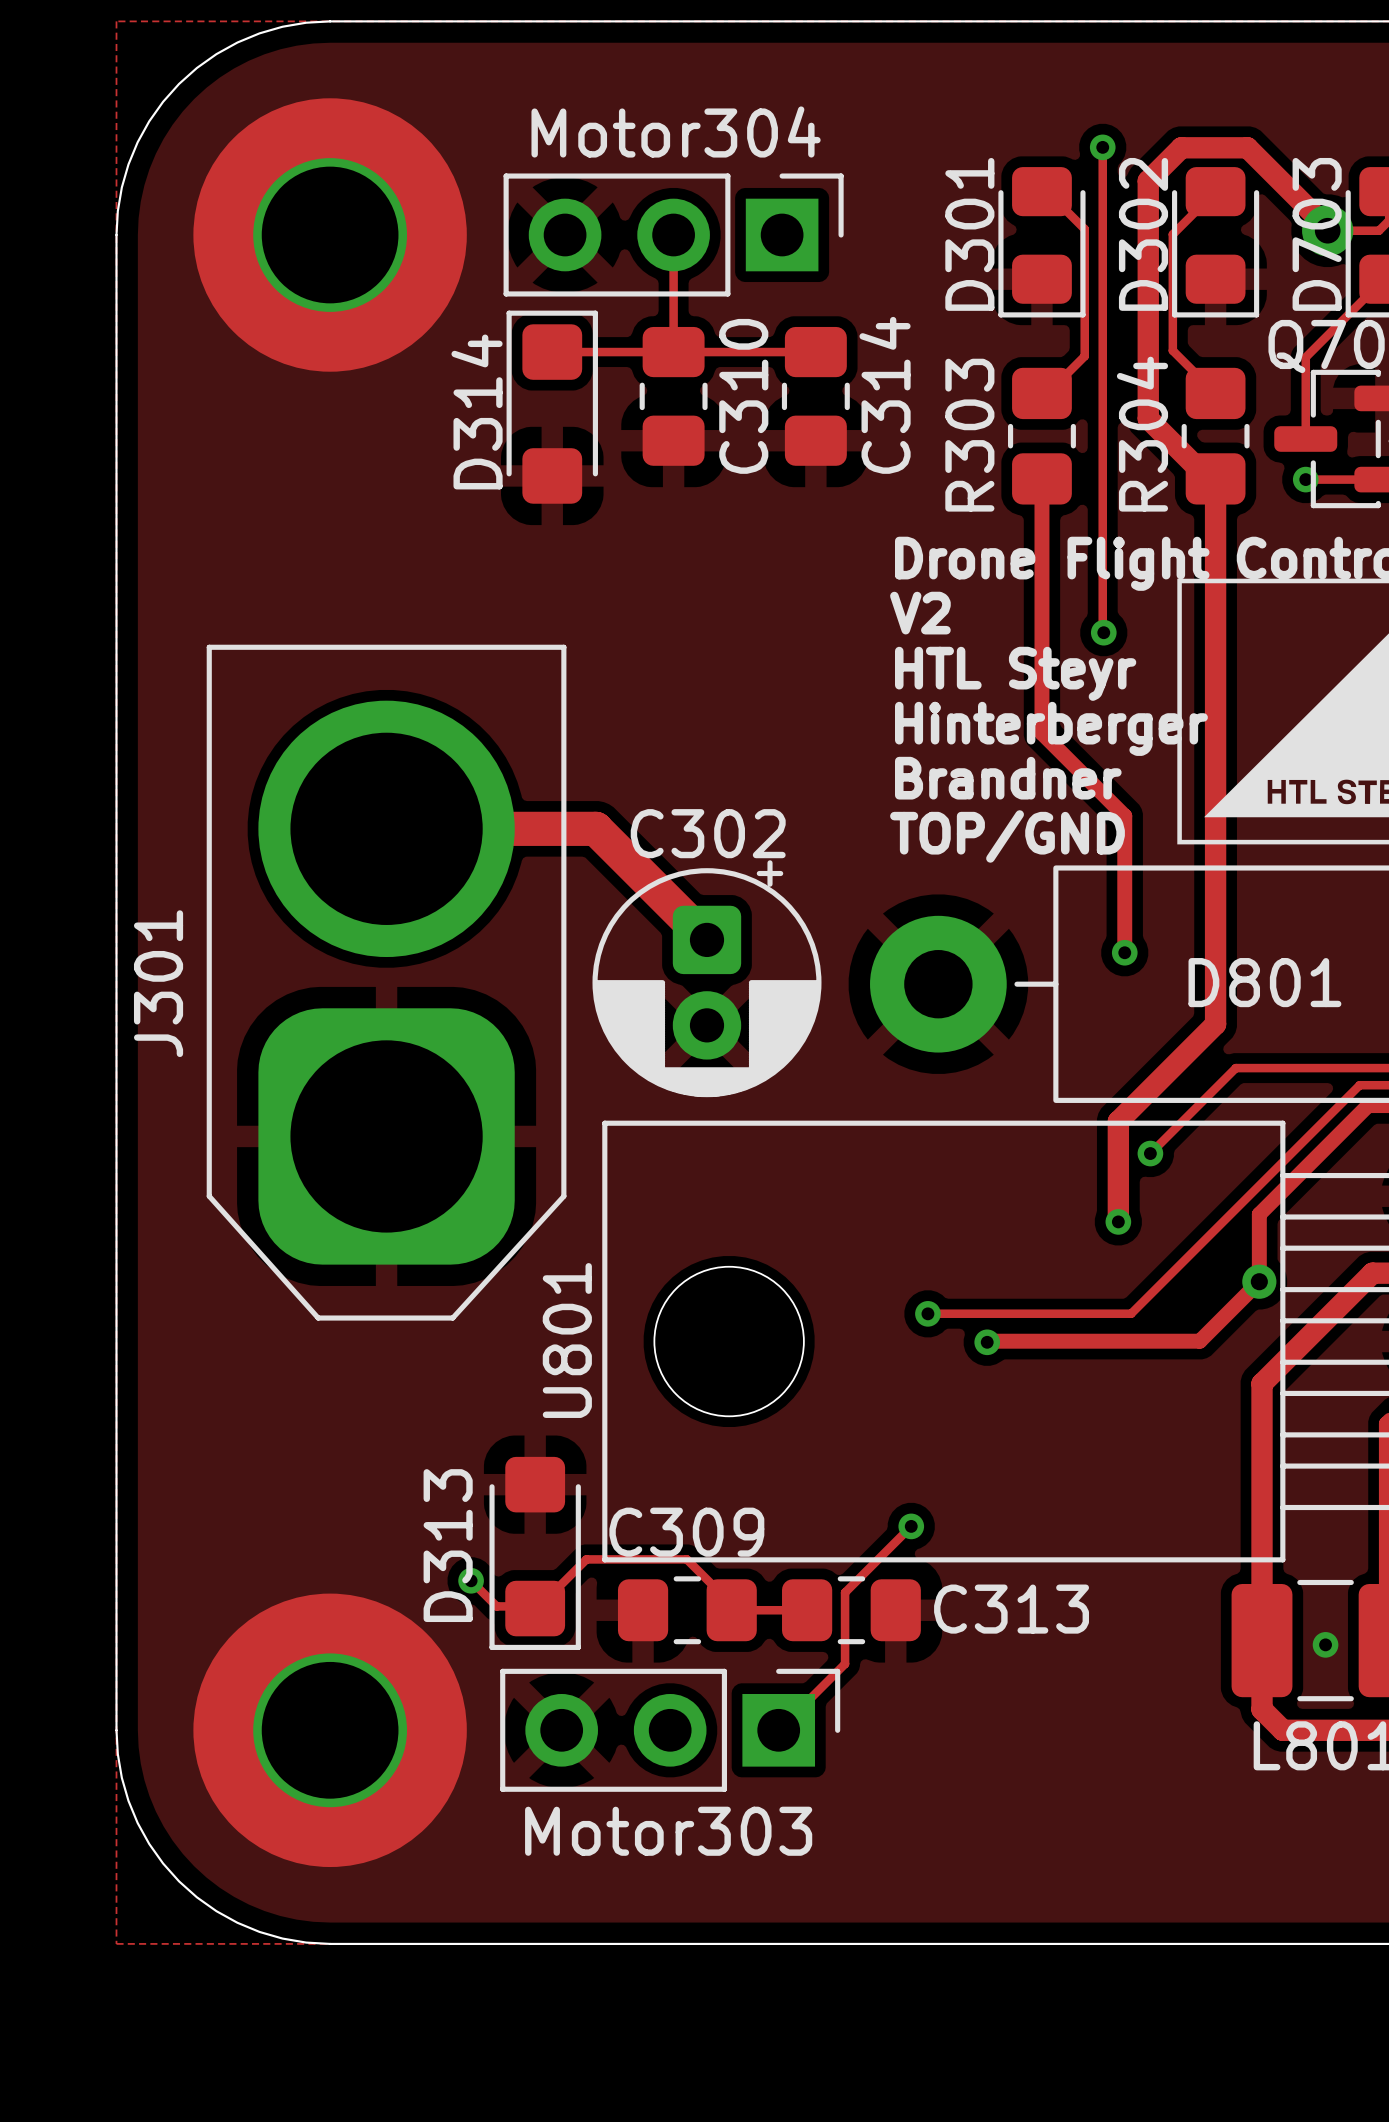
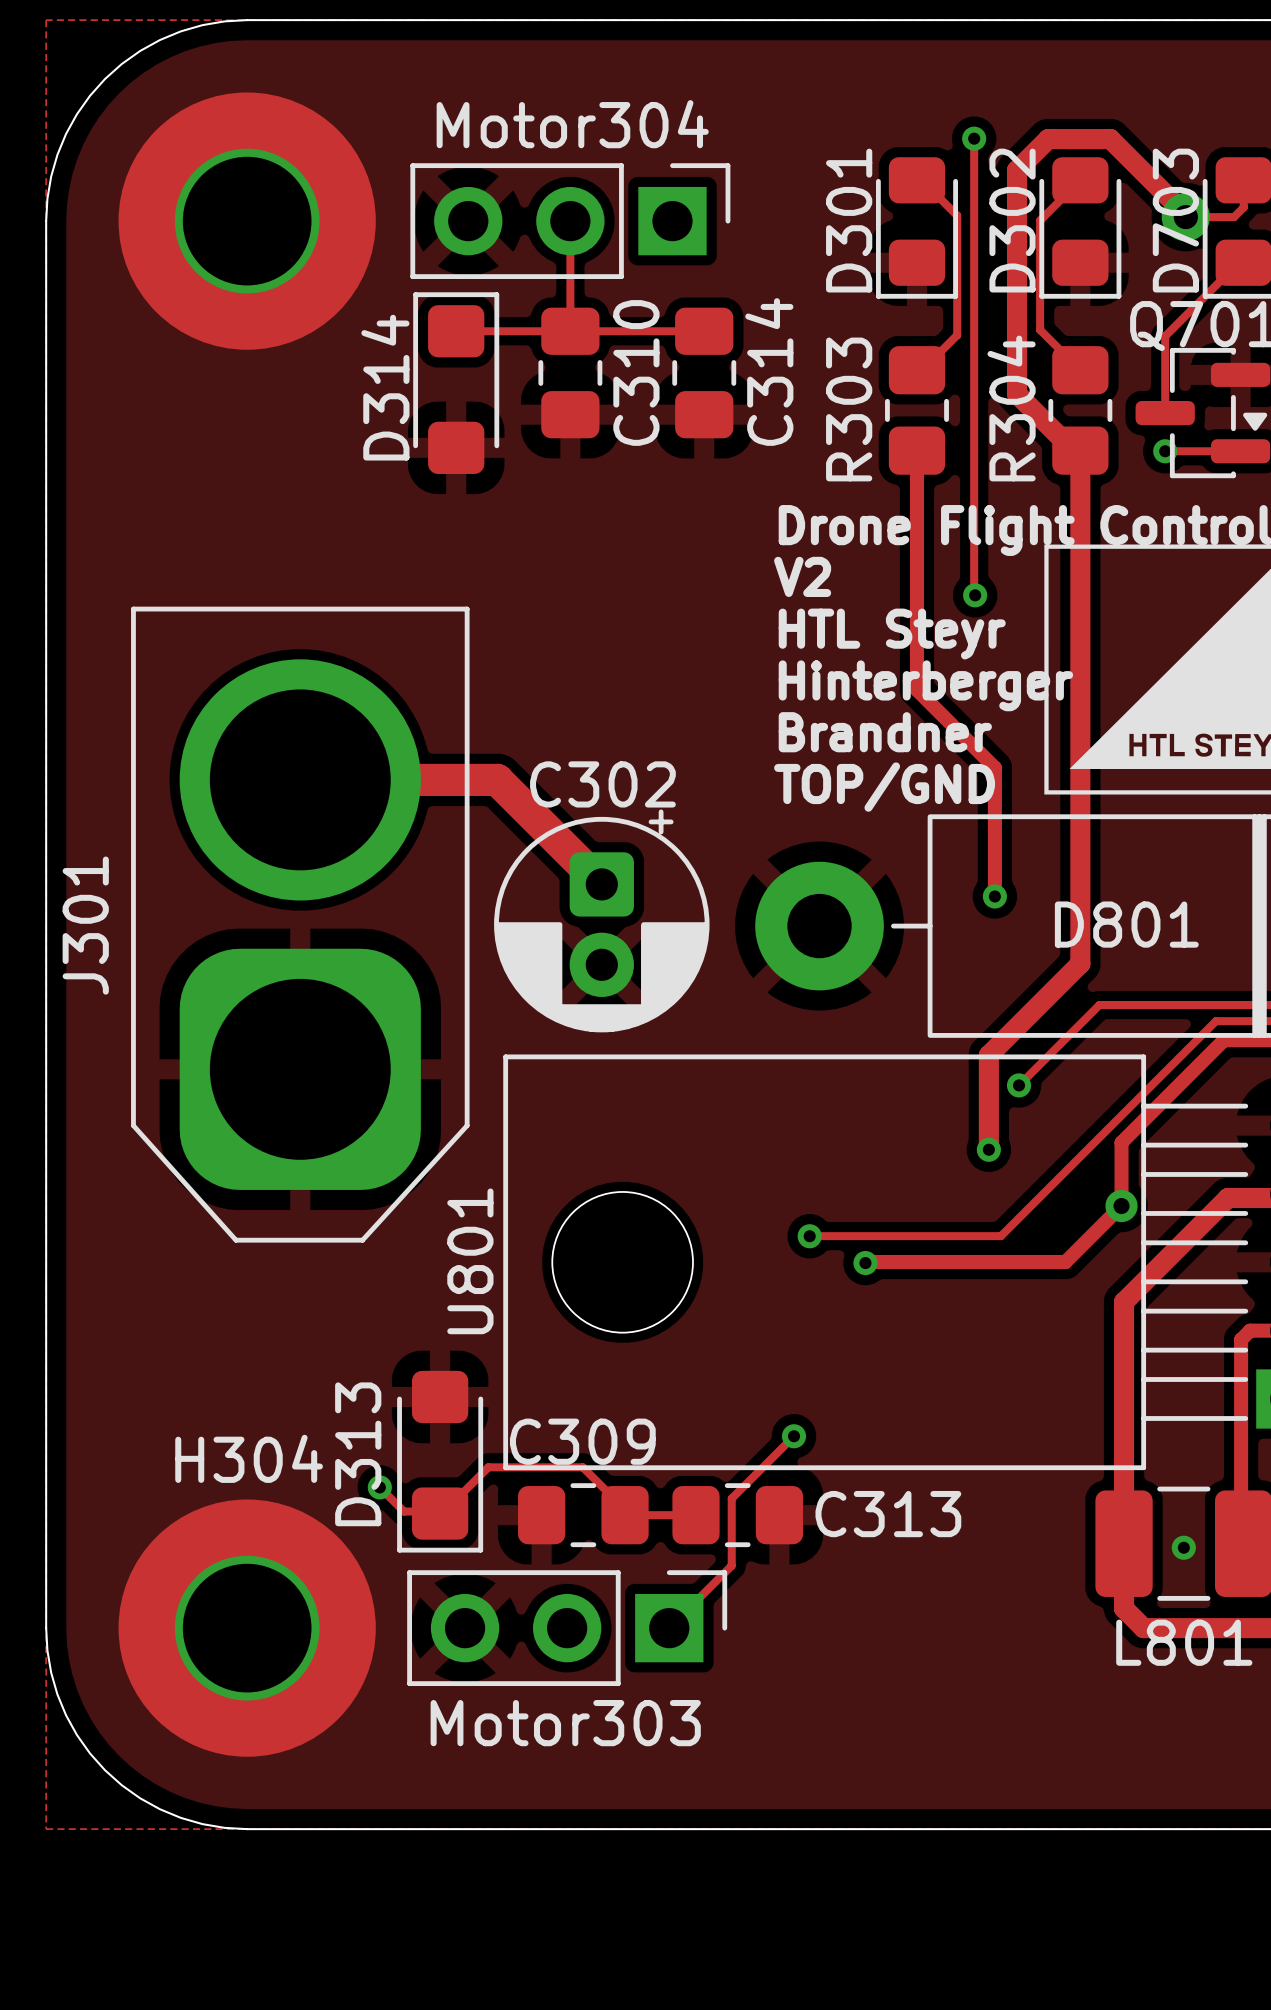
H304 name: none -> H304 (249, 1458)

